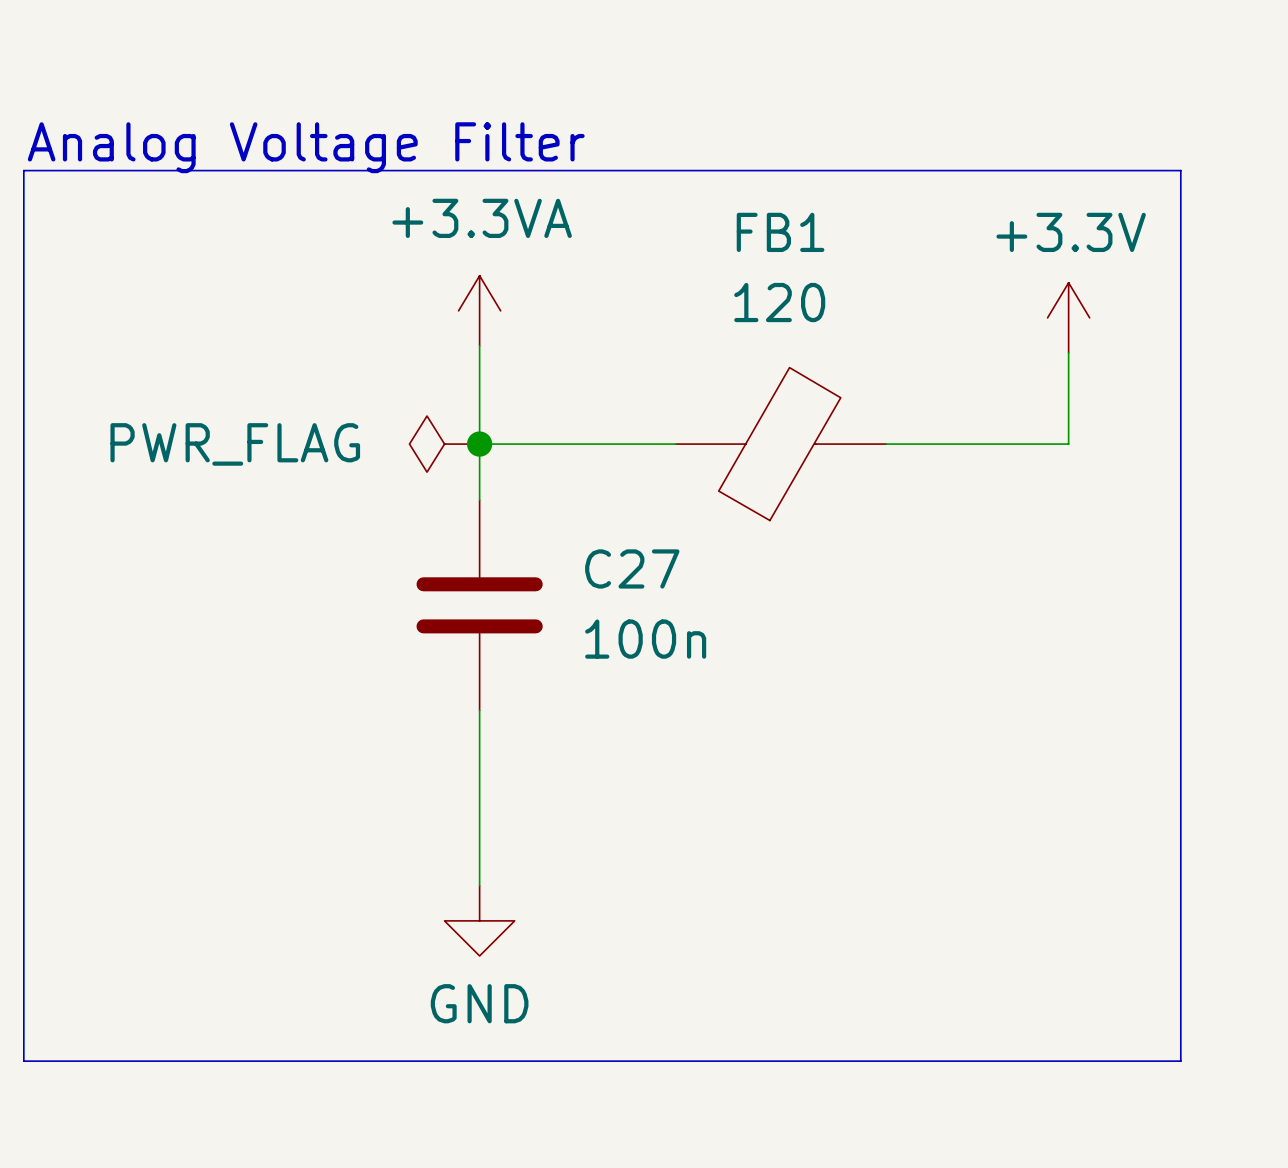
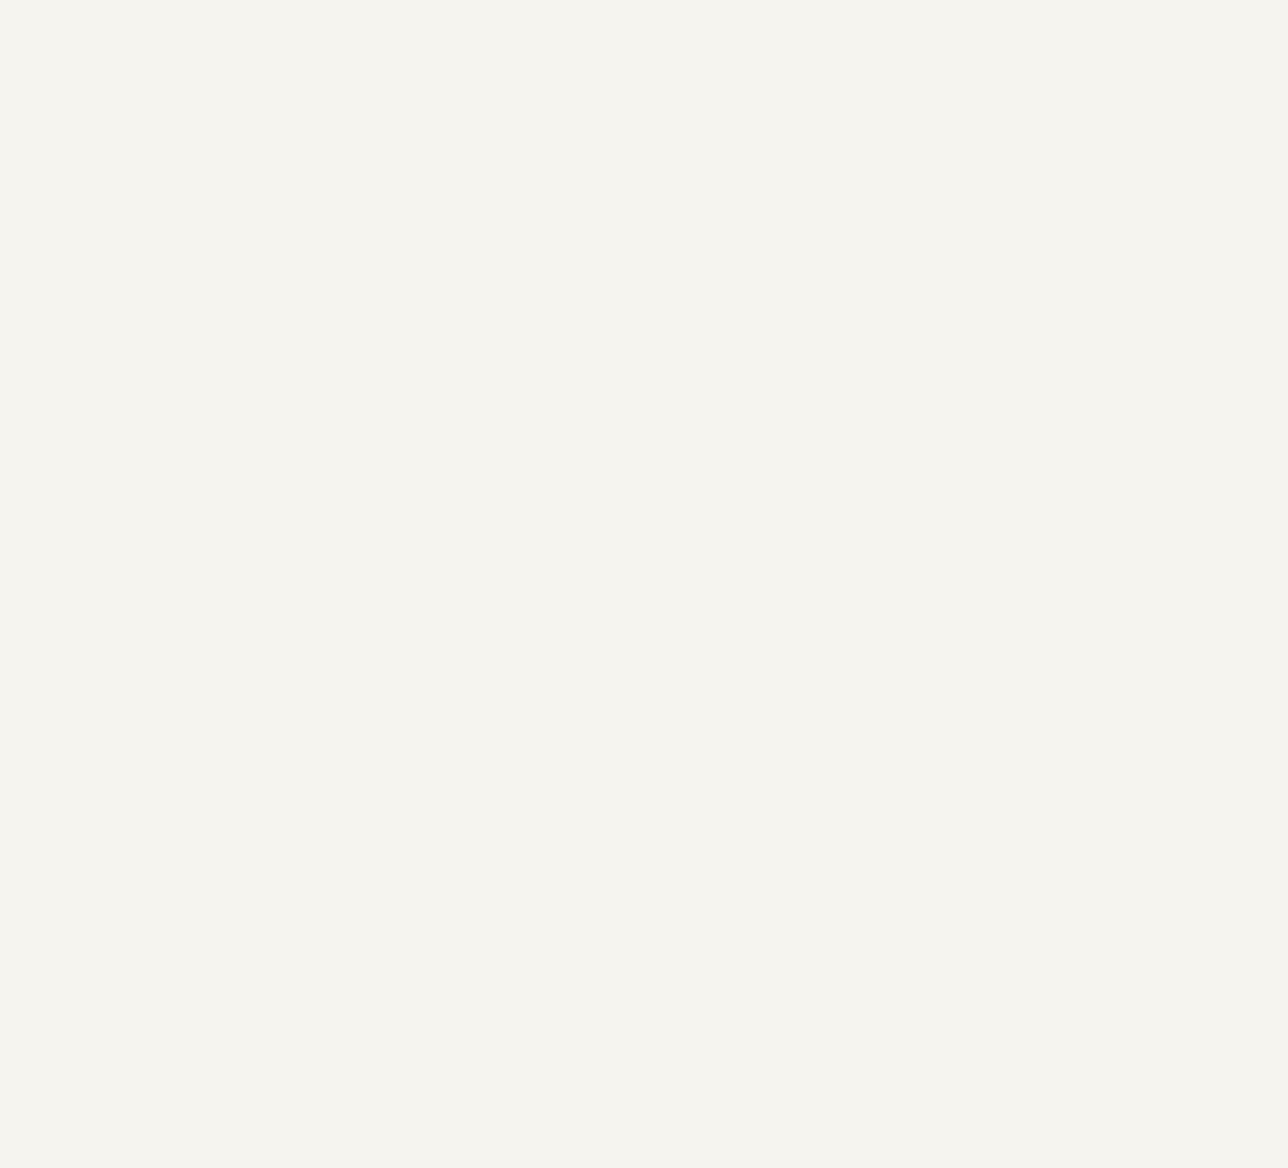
text: Analog Voltage Filter (306, 147) -> none
line: (23, 170) (1180, 170) (1180, 1061) (23, 1061) (23, 170) -> none
power symbol: +3.3VA (479, 310) -> none
power symbol: +3.3V (1068, 317) -> none
wire: (479, 345) (479, 500) -> none
wire: (1068, 352) (1068, 444) (886, 444) -> none
power symbol: PWR_FLAG (444, 444) -> none
wire: (479, 444) (675, 444) -> none
junction: (479, 444) -> none
FB1: 120 (781, 444) -> none
C27: 100n (479, 605) -> none
wire: (479, 710) (479, 885) -> none
power symbol: GND (479, 920) -> none

